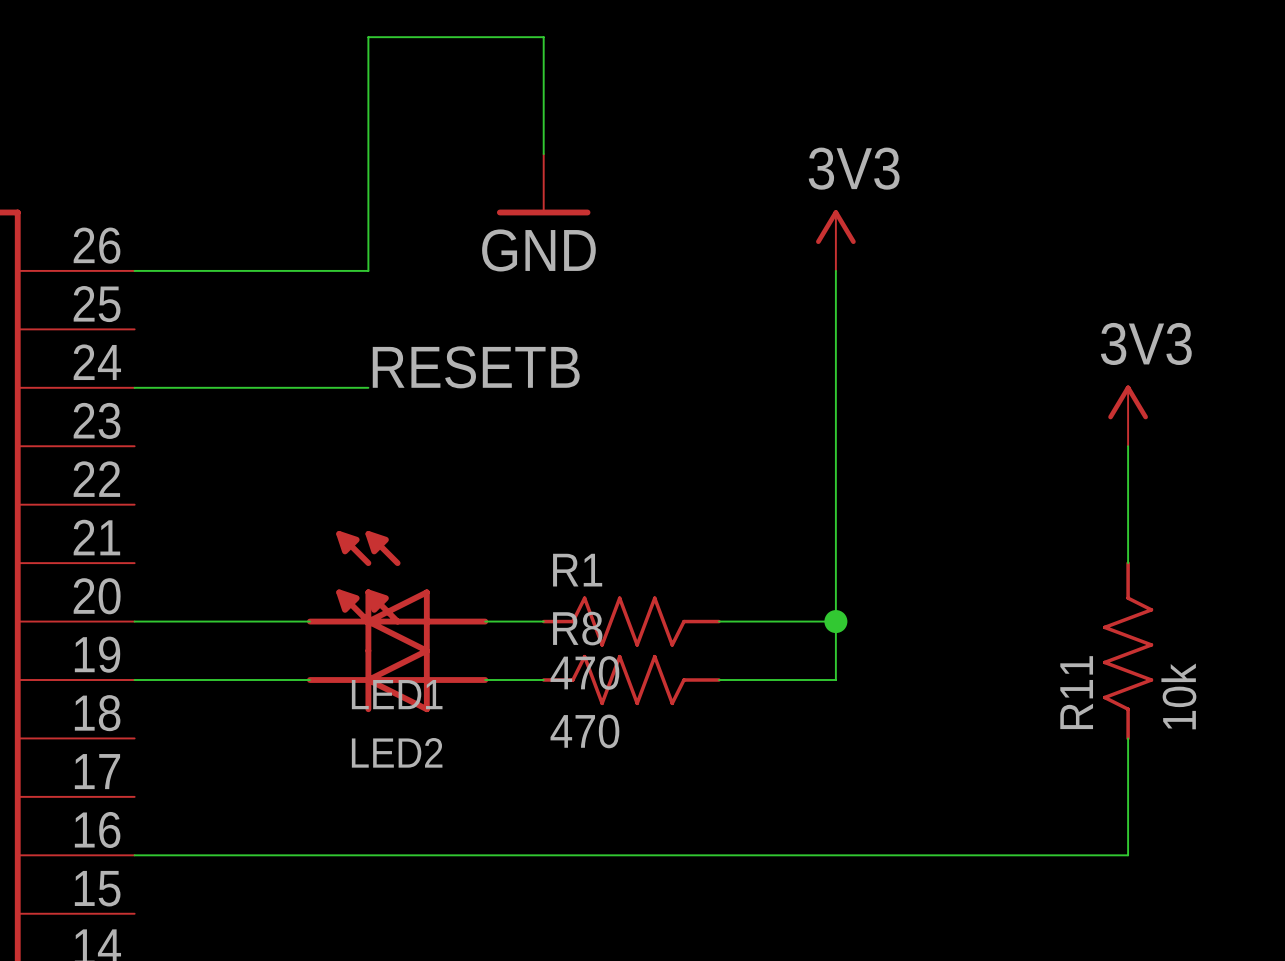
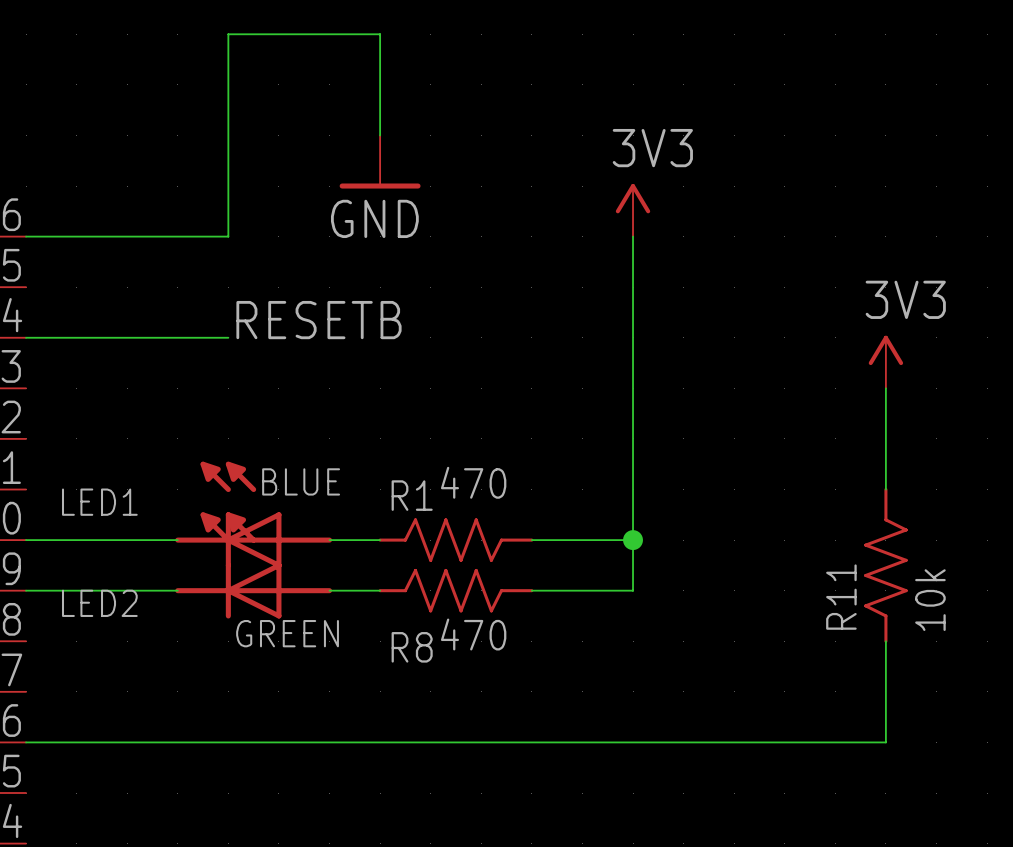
LED1 value: none -> BLUE (301, 481)
R8 name position: R8 (577, 628) -> R8 (412, 647)
R1 value position: 470 (584, 672) -> 470 (473, 482)
LED1 name position: LED1 (397, 694) -> LED1 (99, 502)
LED2 value: none -> GREEN (287, 633)
R8 value position: 470 (584, 731) -> 470 (473, 634)
LED2 name position: LED2 (397, 752) -> LED2 (99, 603)

